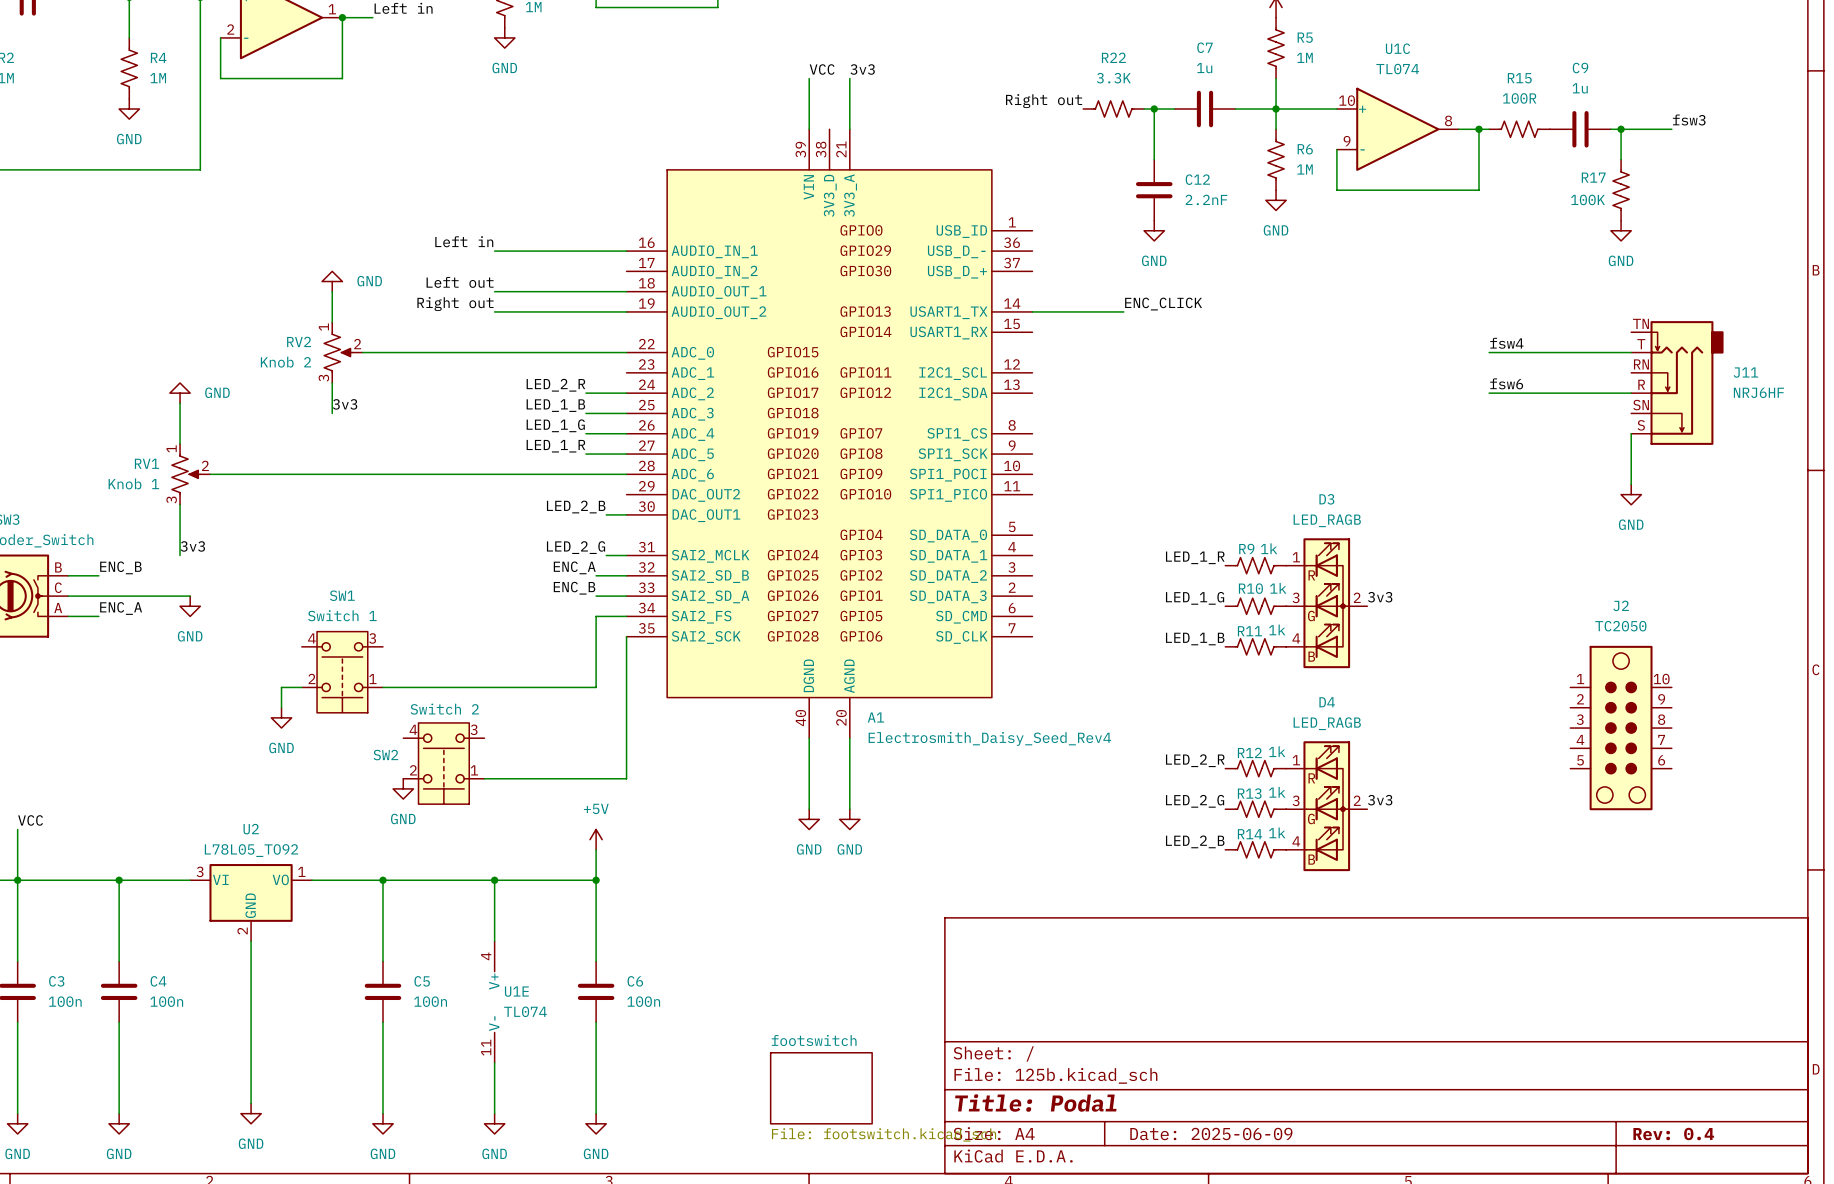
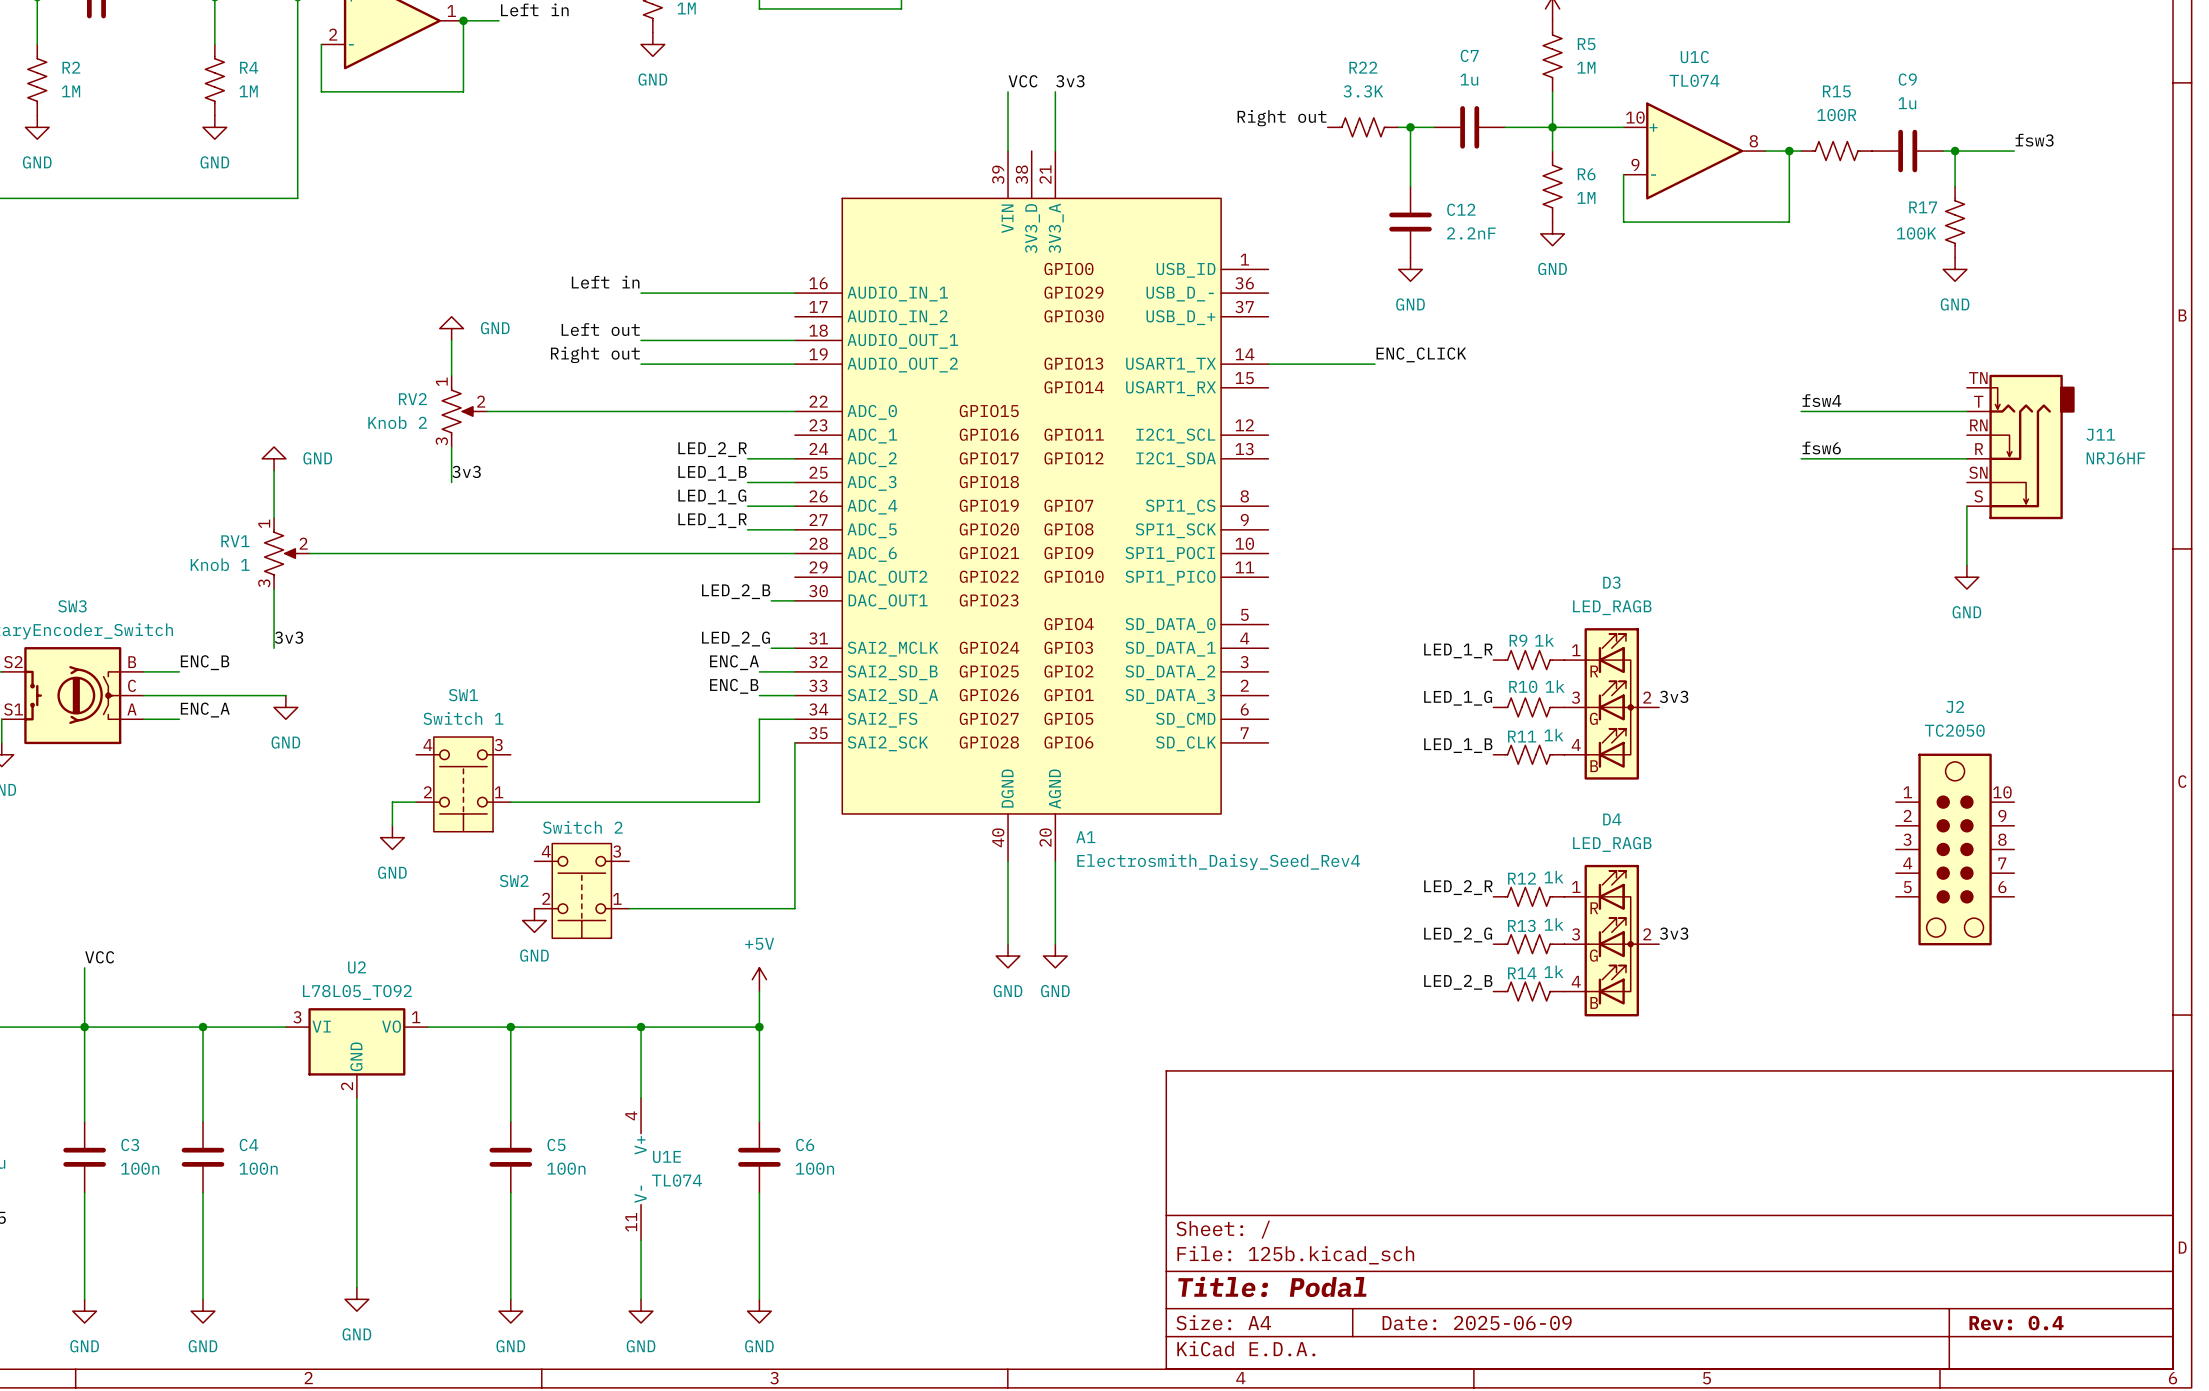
sheet footswitch: File: footswitch.kicad_sch (821, 1088) -> none

